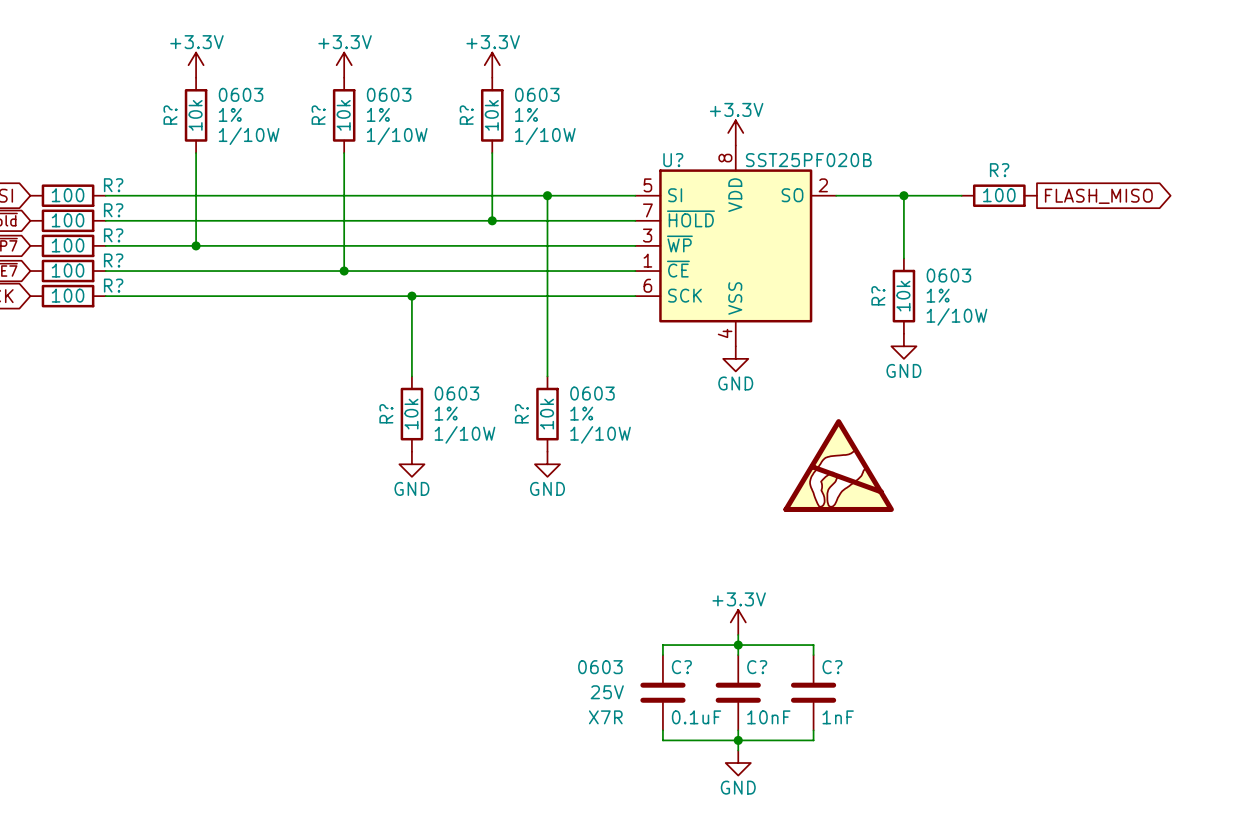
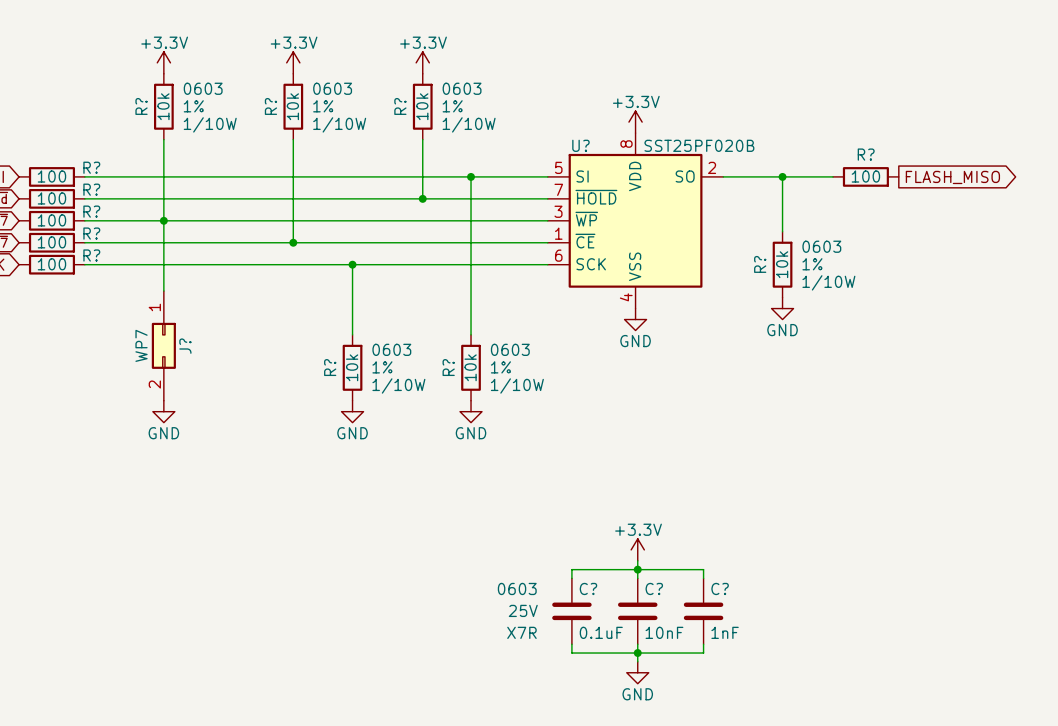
wire: none -> (163, 220) (163, 291)
J?: none -> WP7 (163, 345)
power symbol: none -> GND (163, 411)
power symbol: (838, 465) -> none

